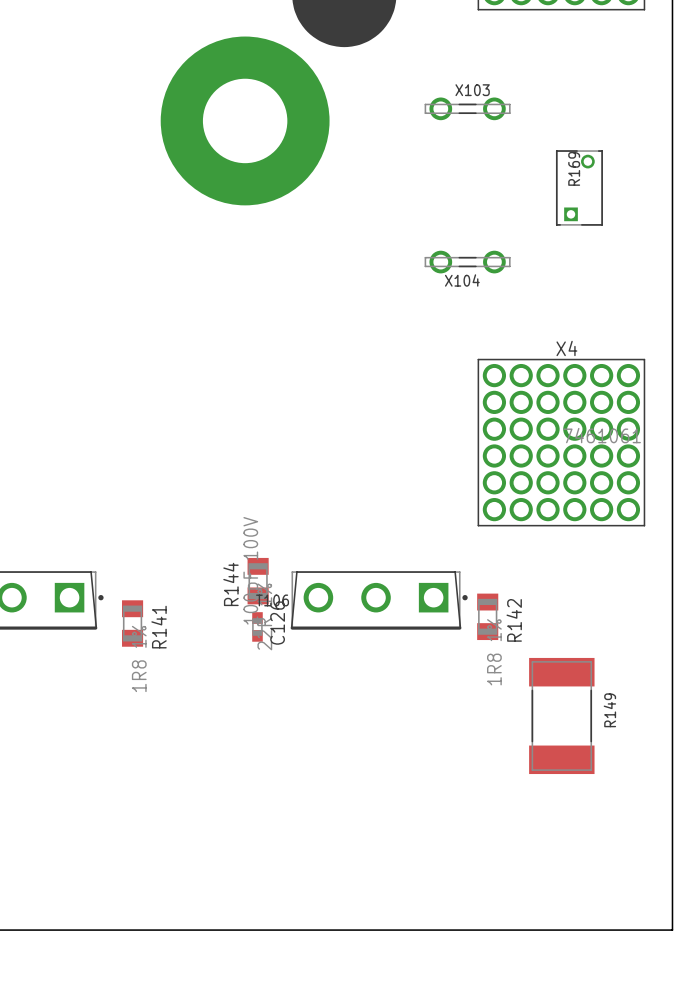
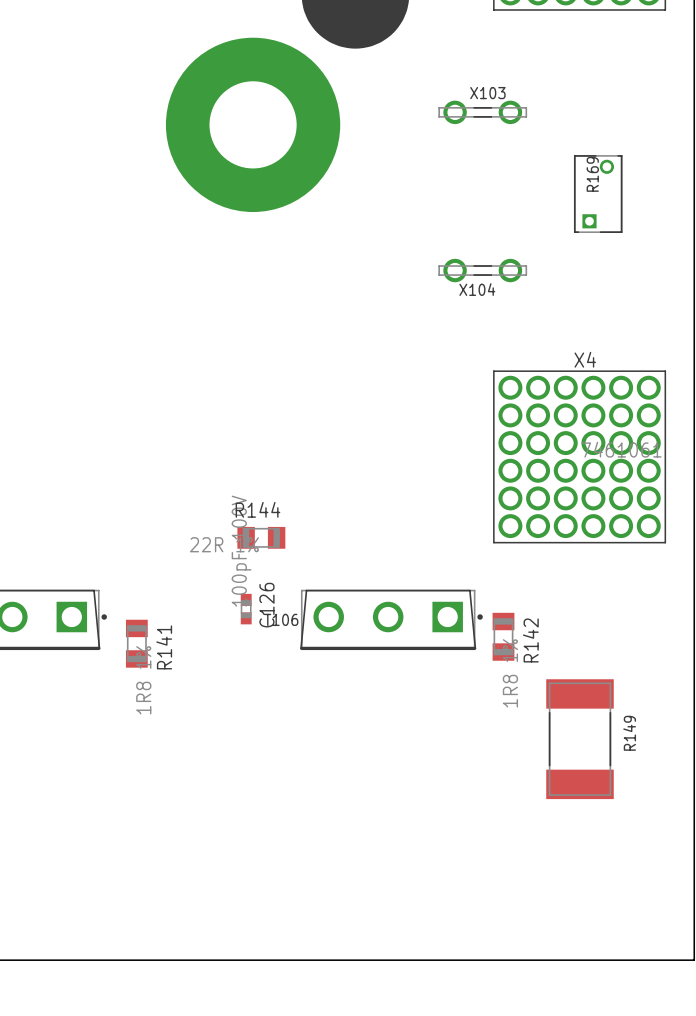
R144 rotation: 0° (258, 581) -> 90° clockwise (261, 537)
R144 position: (258, 581) -> (261, 537)
C126 position: (257, 626) -> (246, 609)

